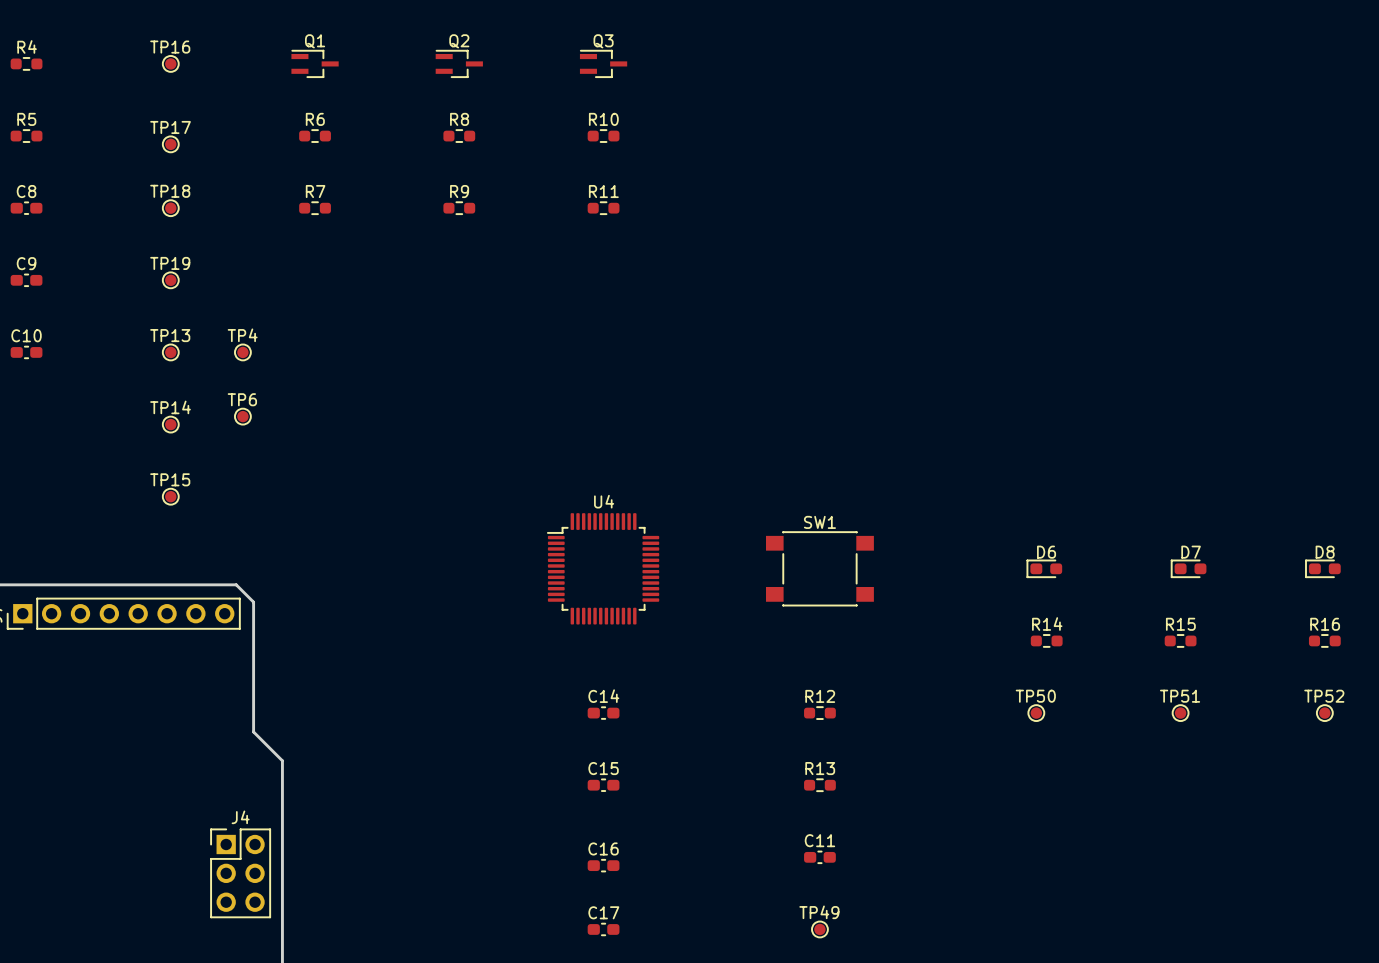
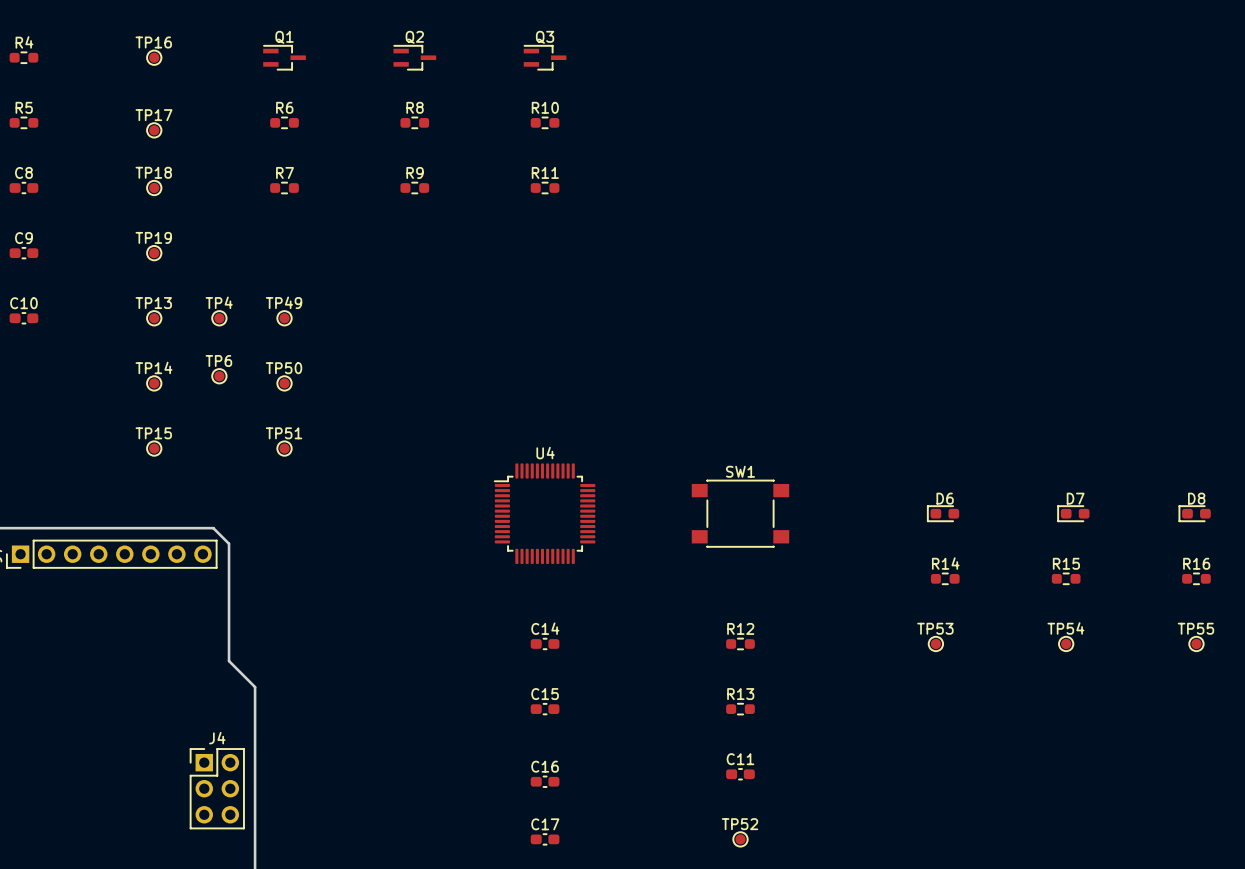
TP49: none -> (284, 318)
TP50: none -> (284, 383)
TP51: none -> (284, 448)
TP50 name: TP50 (1035, 696) -> TP53 (935, 628)
TP51 name: TP51 (1180, 696) -> TP54 (1065, 628)
TP52 name: TP52 (1324, 696) -> TP55 (1195, 628)
TP49 name: TP49 (819, 912) -> TP52 (740, 824)

